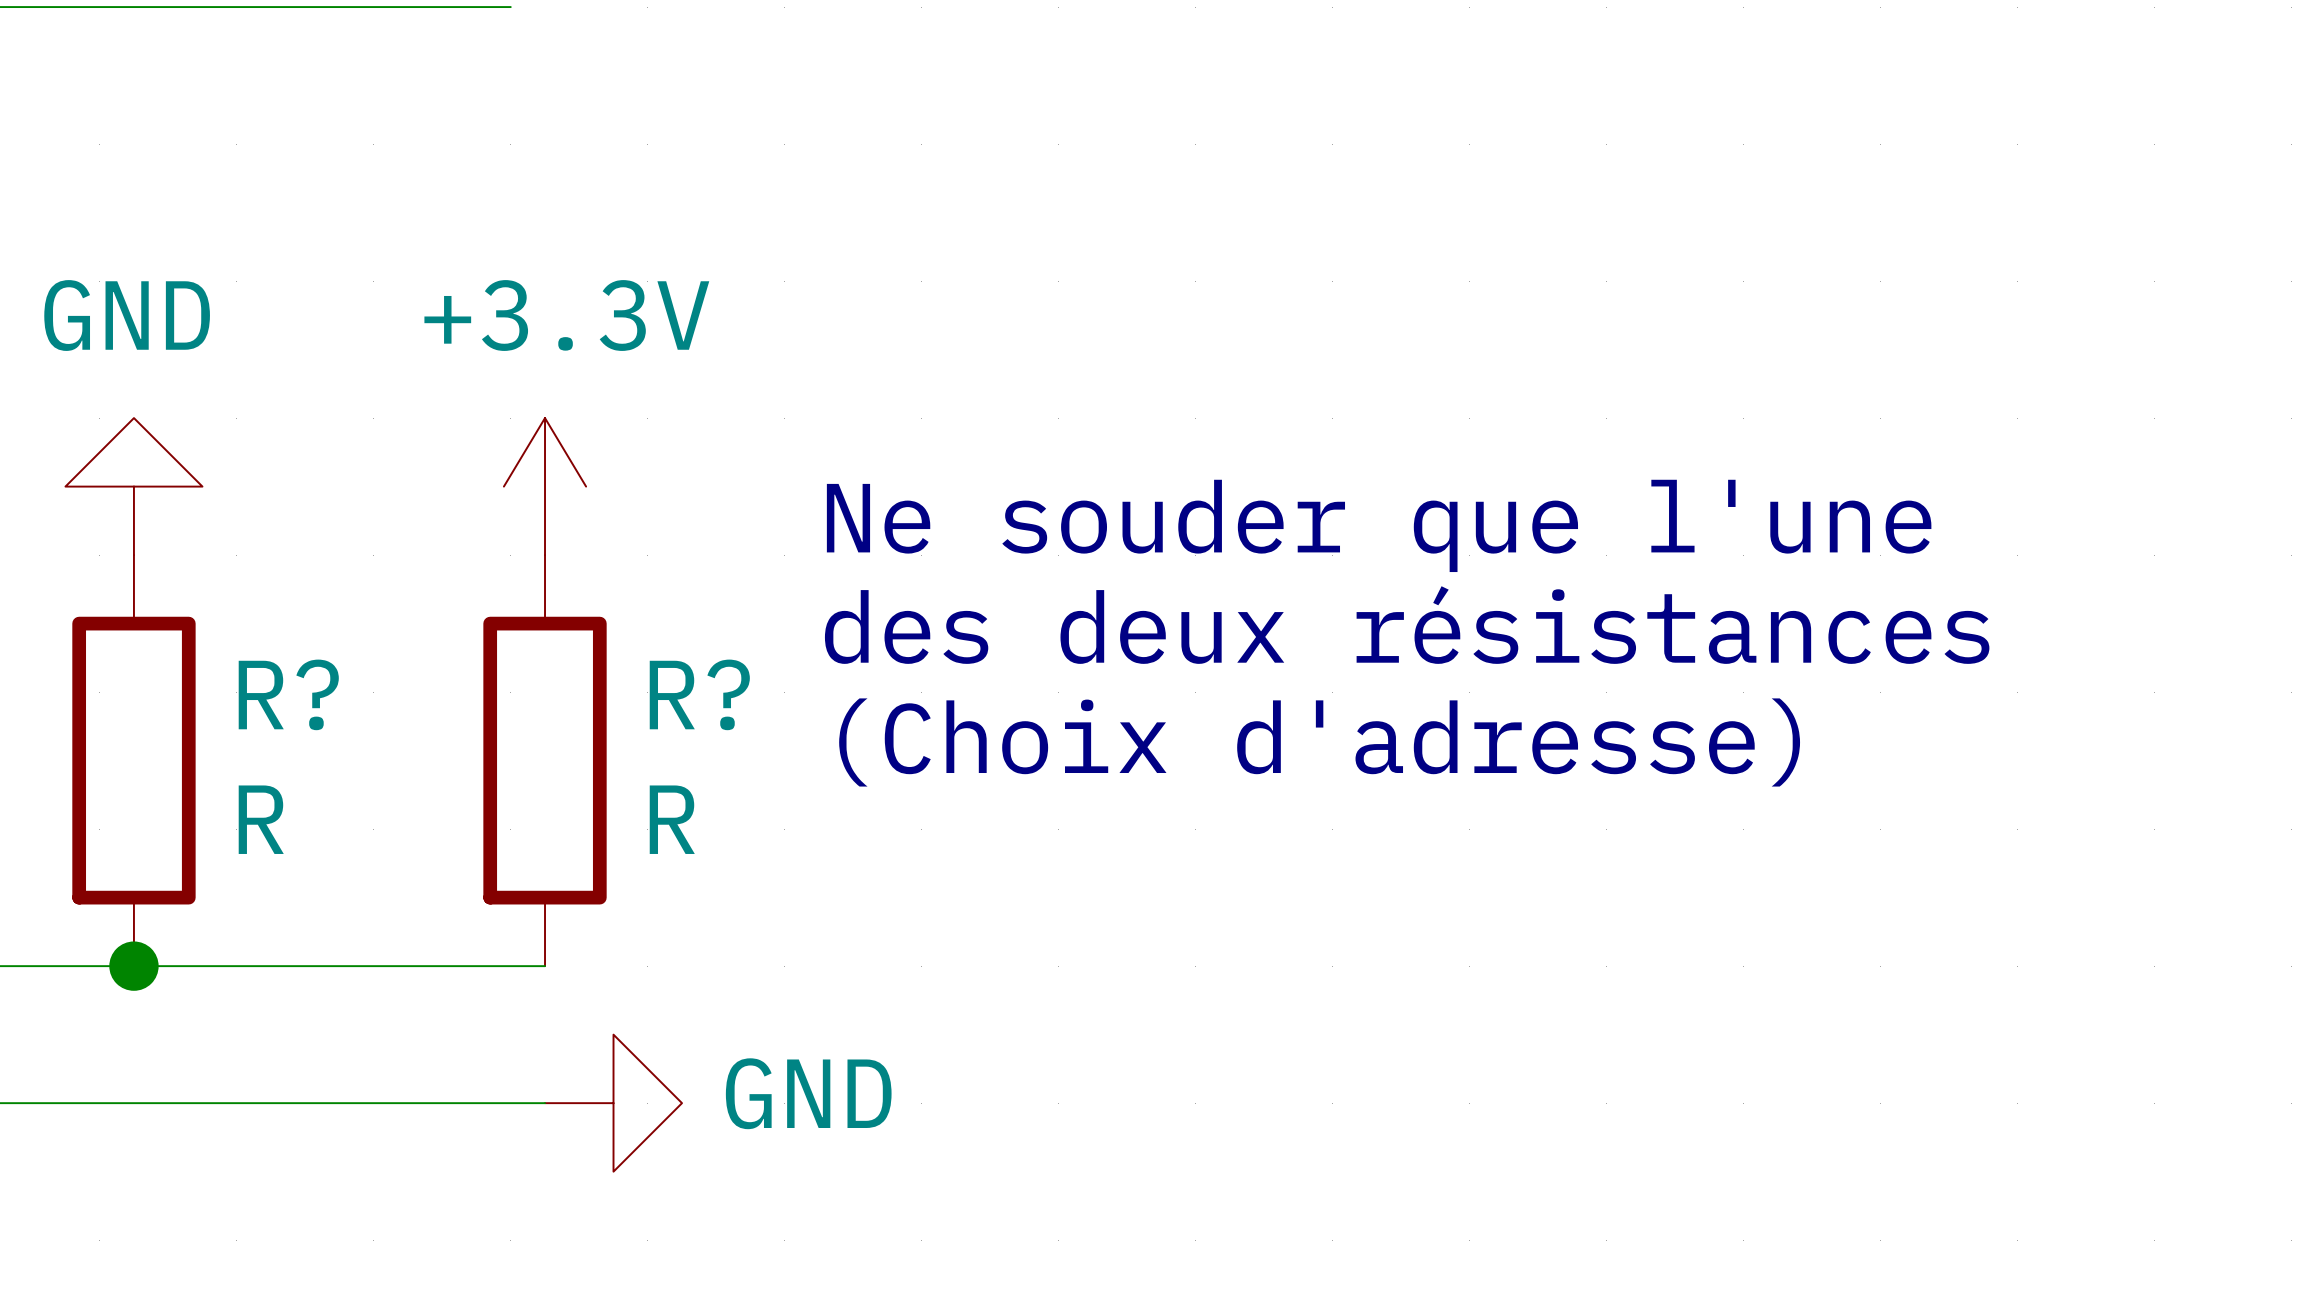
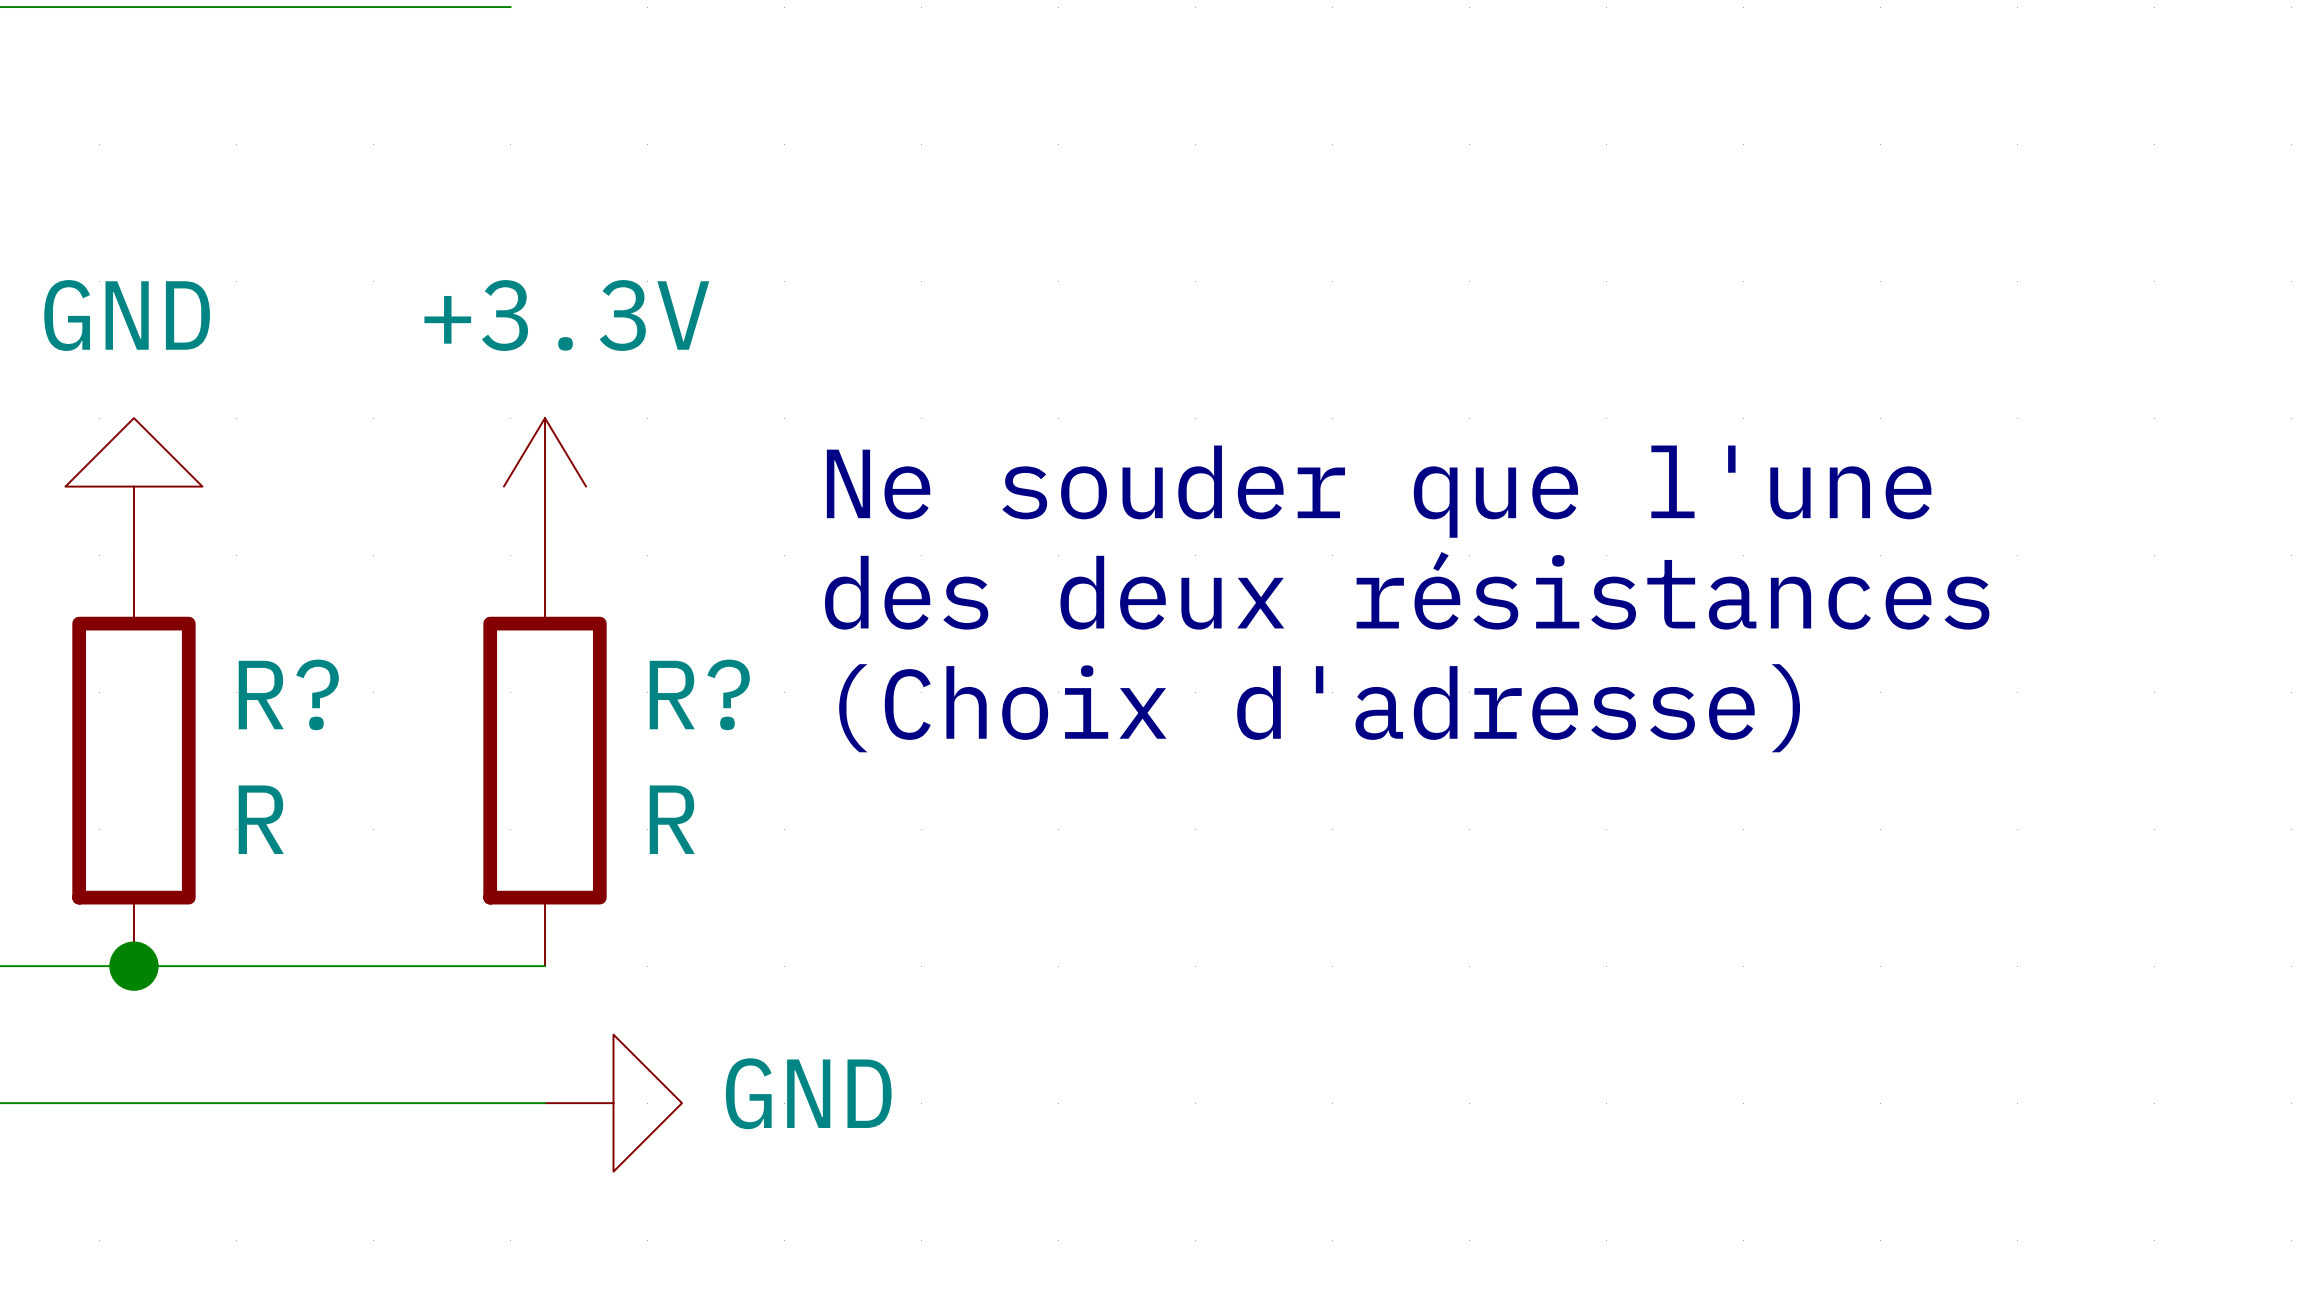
text position: Ne souder que l'une (1379, 525) -> Ne souder que l'une (1379, 491)
text position: des deux résistances (1407, 625) -> des deux résistances (1407, 590)
text position: (Choix d'adresse) (1319, 742) -> (Choix d'adresse) (1319, 708)

